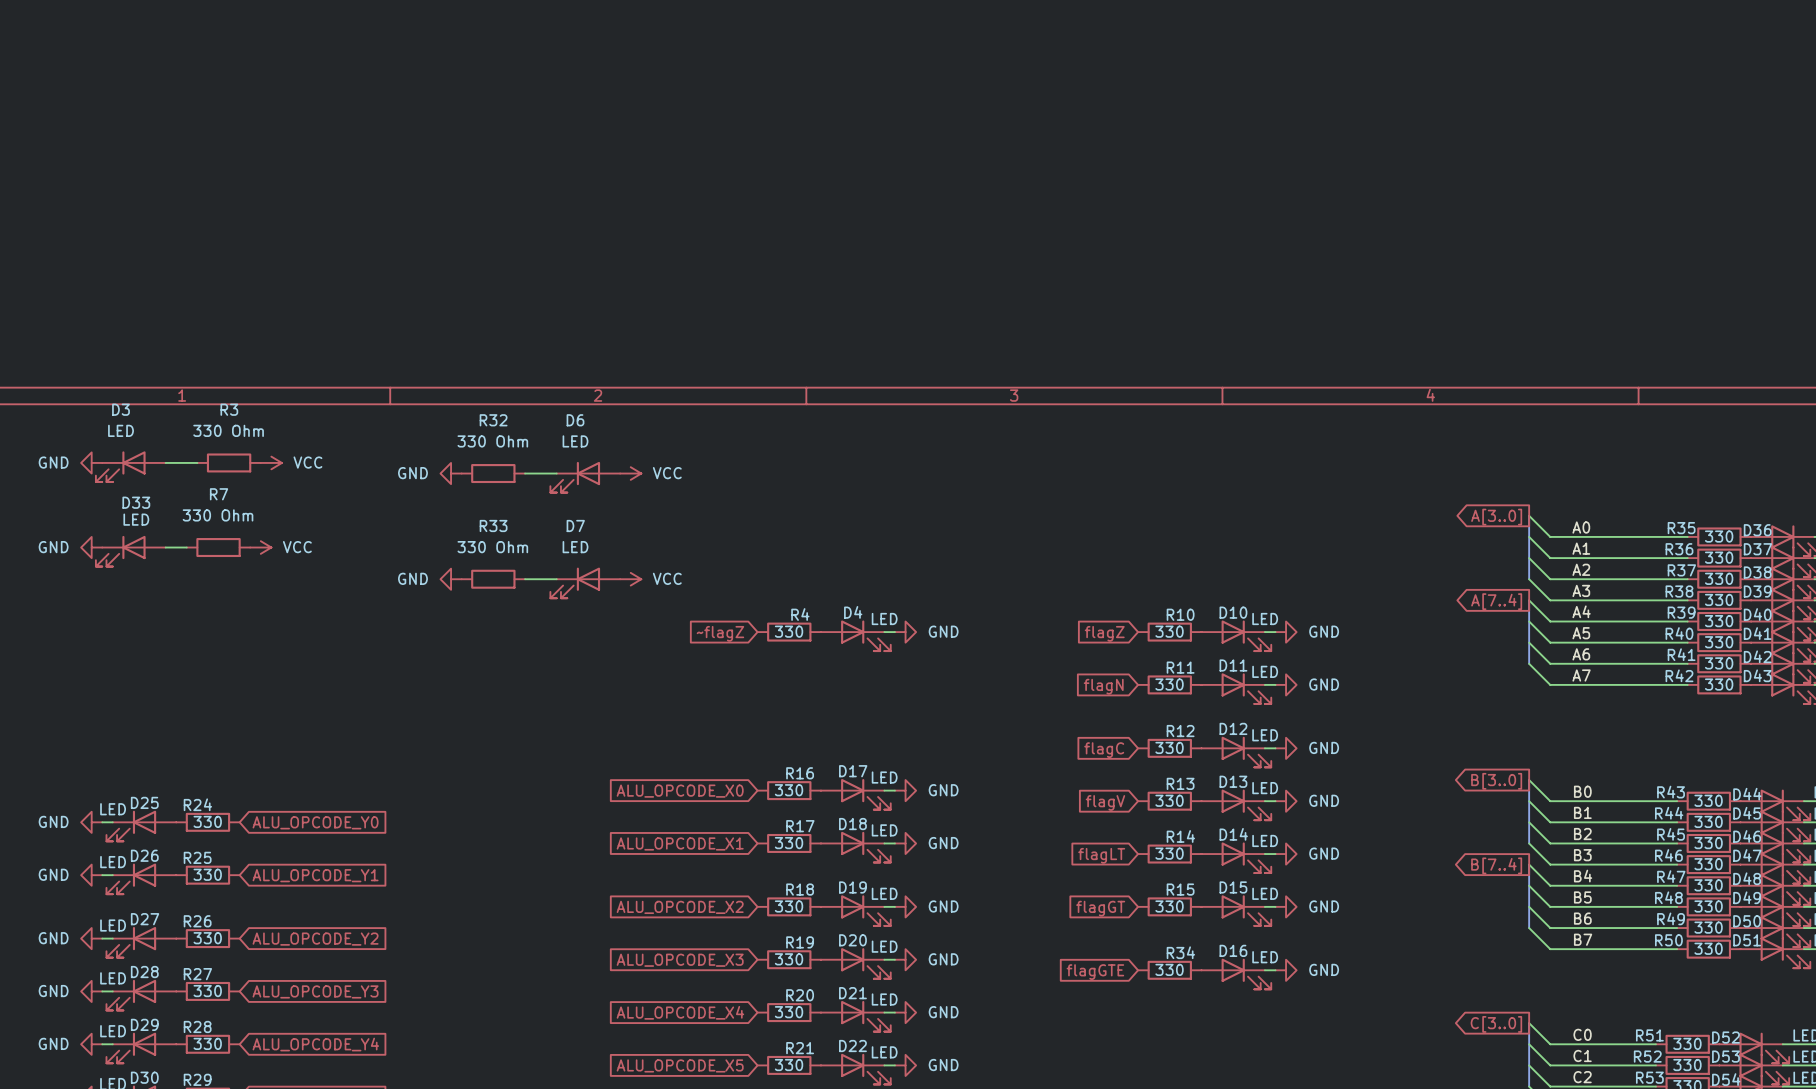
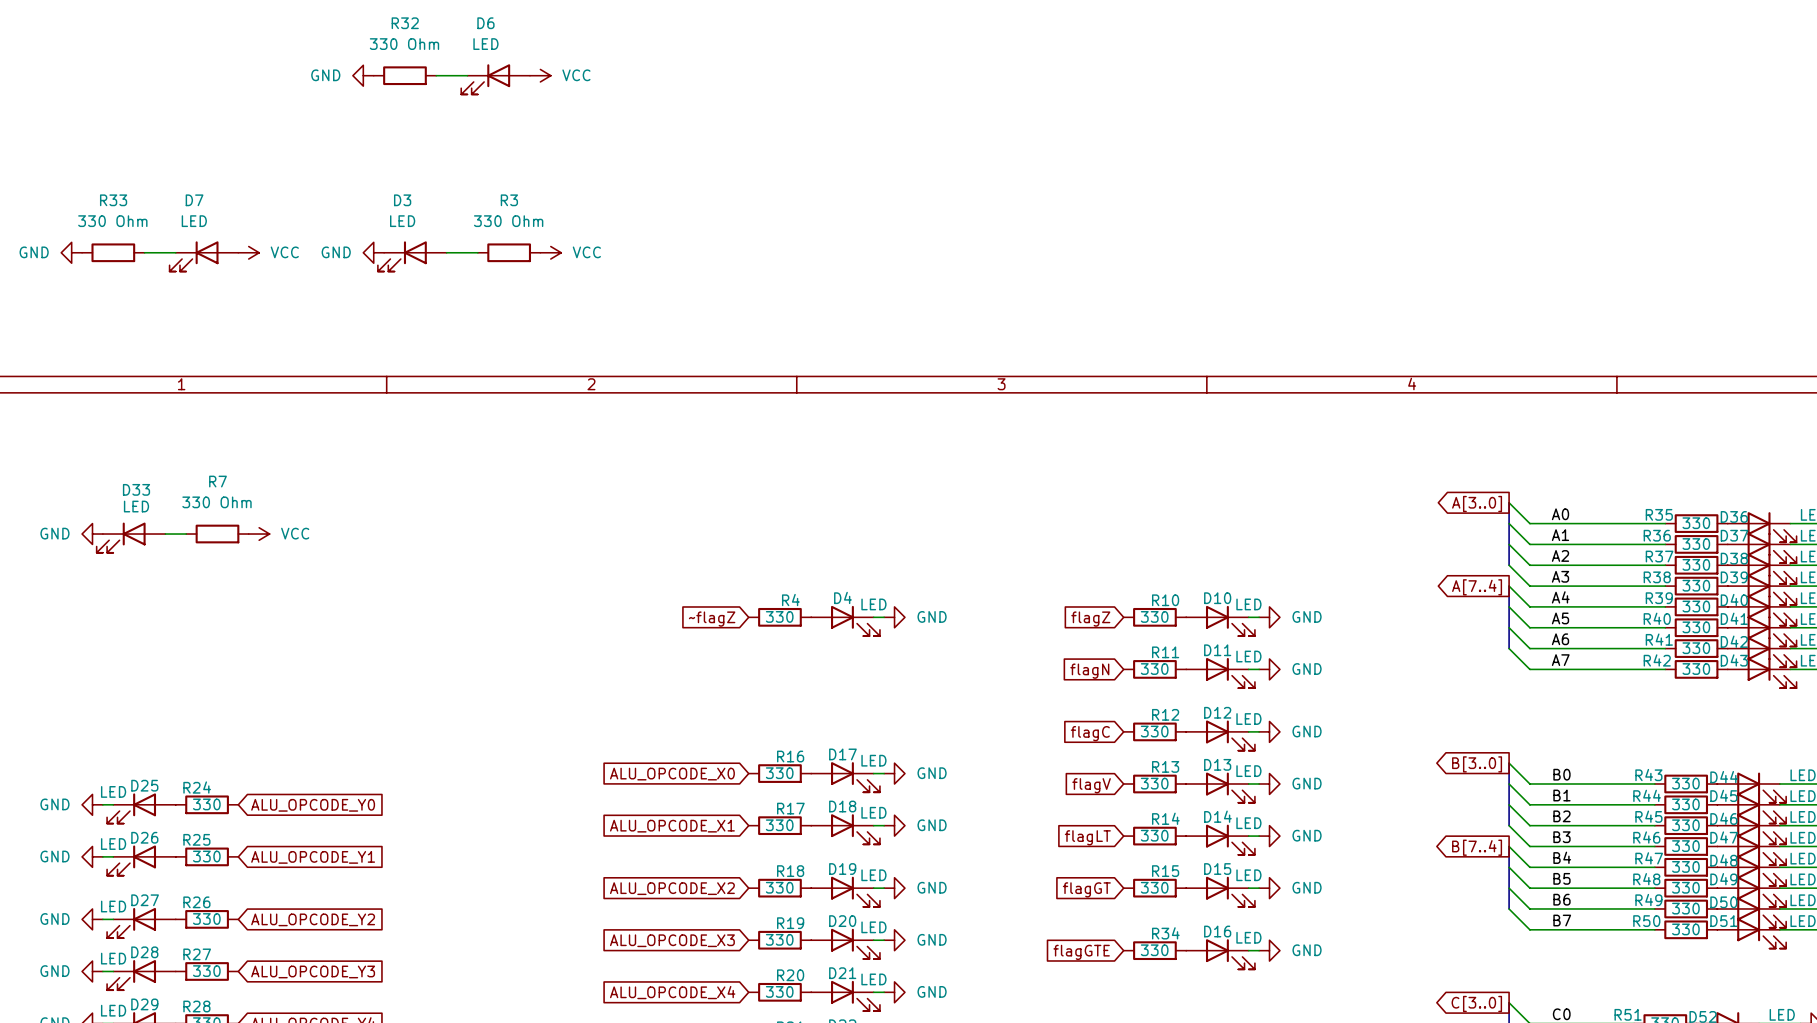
power symbol: none -> GND (363, 75)
wire: none -> (436, 75) (467, 75)
power symbol: none -> VCC (540, 75)
power symbol: none -> GND (71, 252)
power symbol: none -> VCC (248, 252)
power symbol: none -> GND (373, 252)
wire: none -> (446, 252) (477, 252)
power symbol: none -> VCC (550, 252)
power symbol: GND (91, 462) -> none
wire: (165, 462) (197, 462) -> (144, 252) (175, 252)
R3 position: (229, 462) -> (509, 252)
power symbol: VCC (271, 462) -> none
D3 position: (130, 466) -> (412, 256)
power symbol: GND (451, 473) -> none
R32 position: (493, 473) -> (404, 75)
wire: (525, 473) (556, 473) -> none
power symbol: VCC (630, 473) -> none
D6 position: (585, 477) -> (495, 79)
power symbol: GND (451, 579) -> none
R33 position: (493, 579) -> (113, 252)
wire: (525, 579) (556, 579) -> none
power symbol: VCC (630, 579) -> none
D7 position: (585, 582) -> (203, 256)

